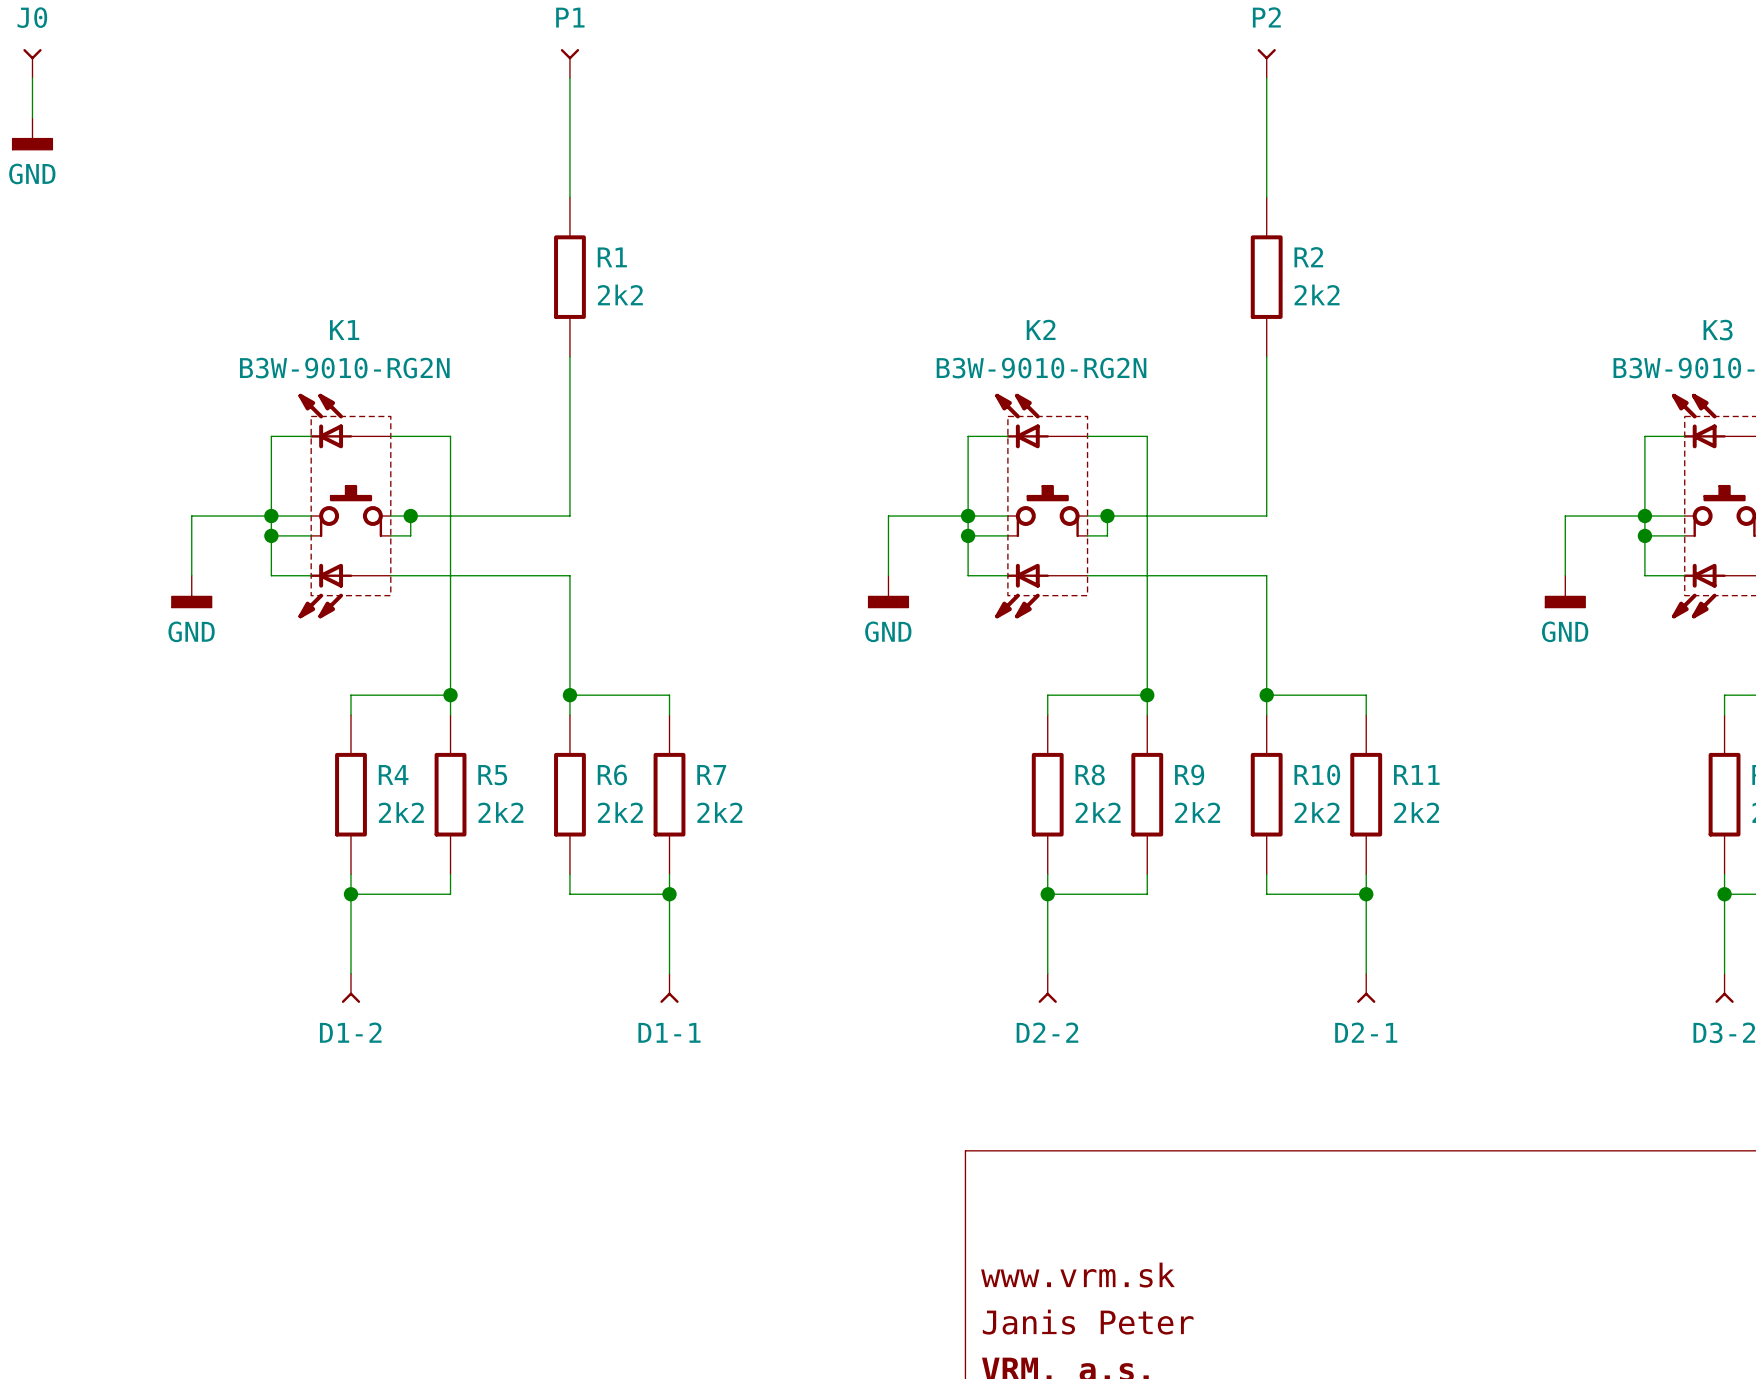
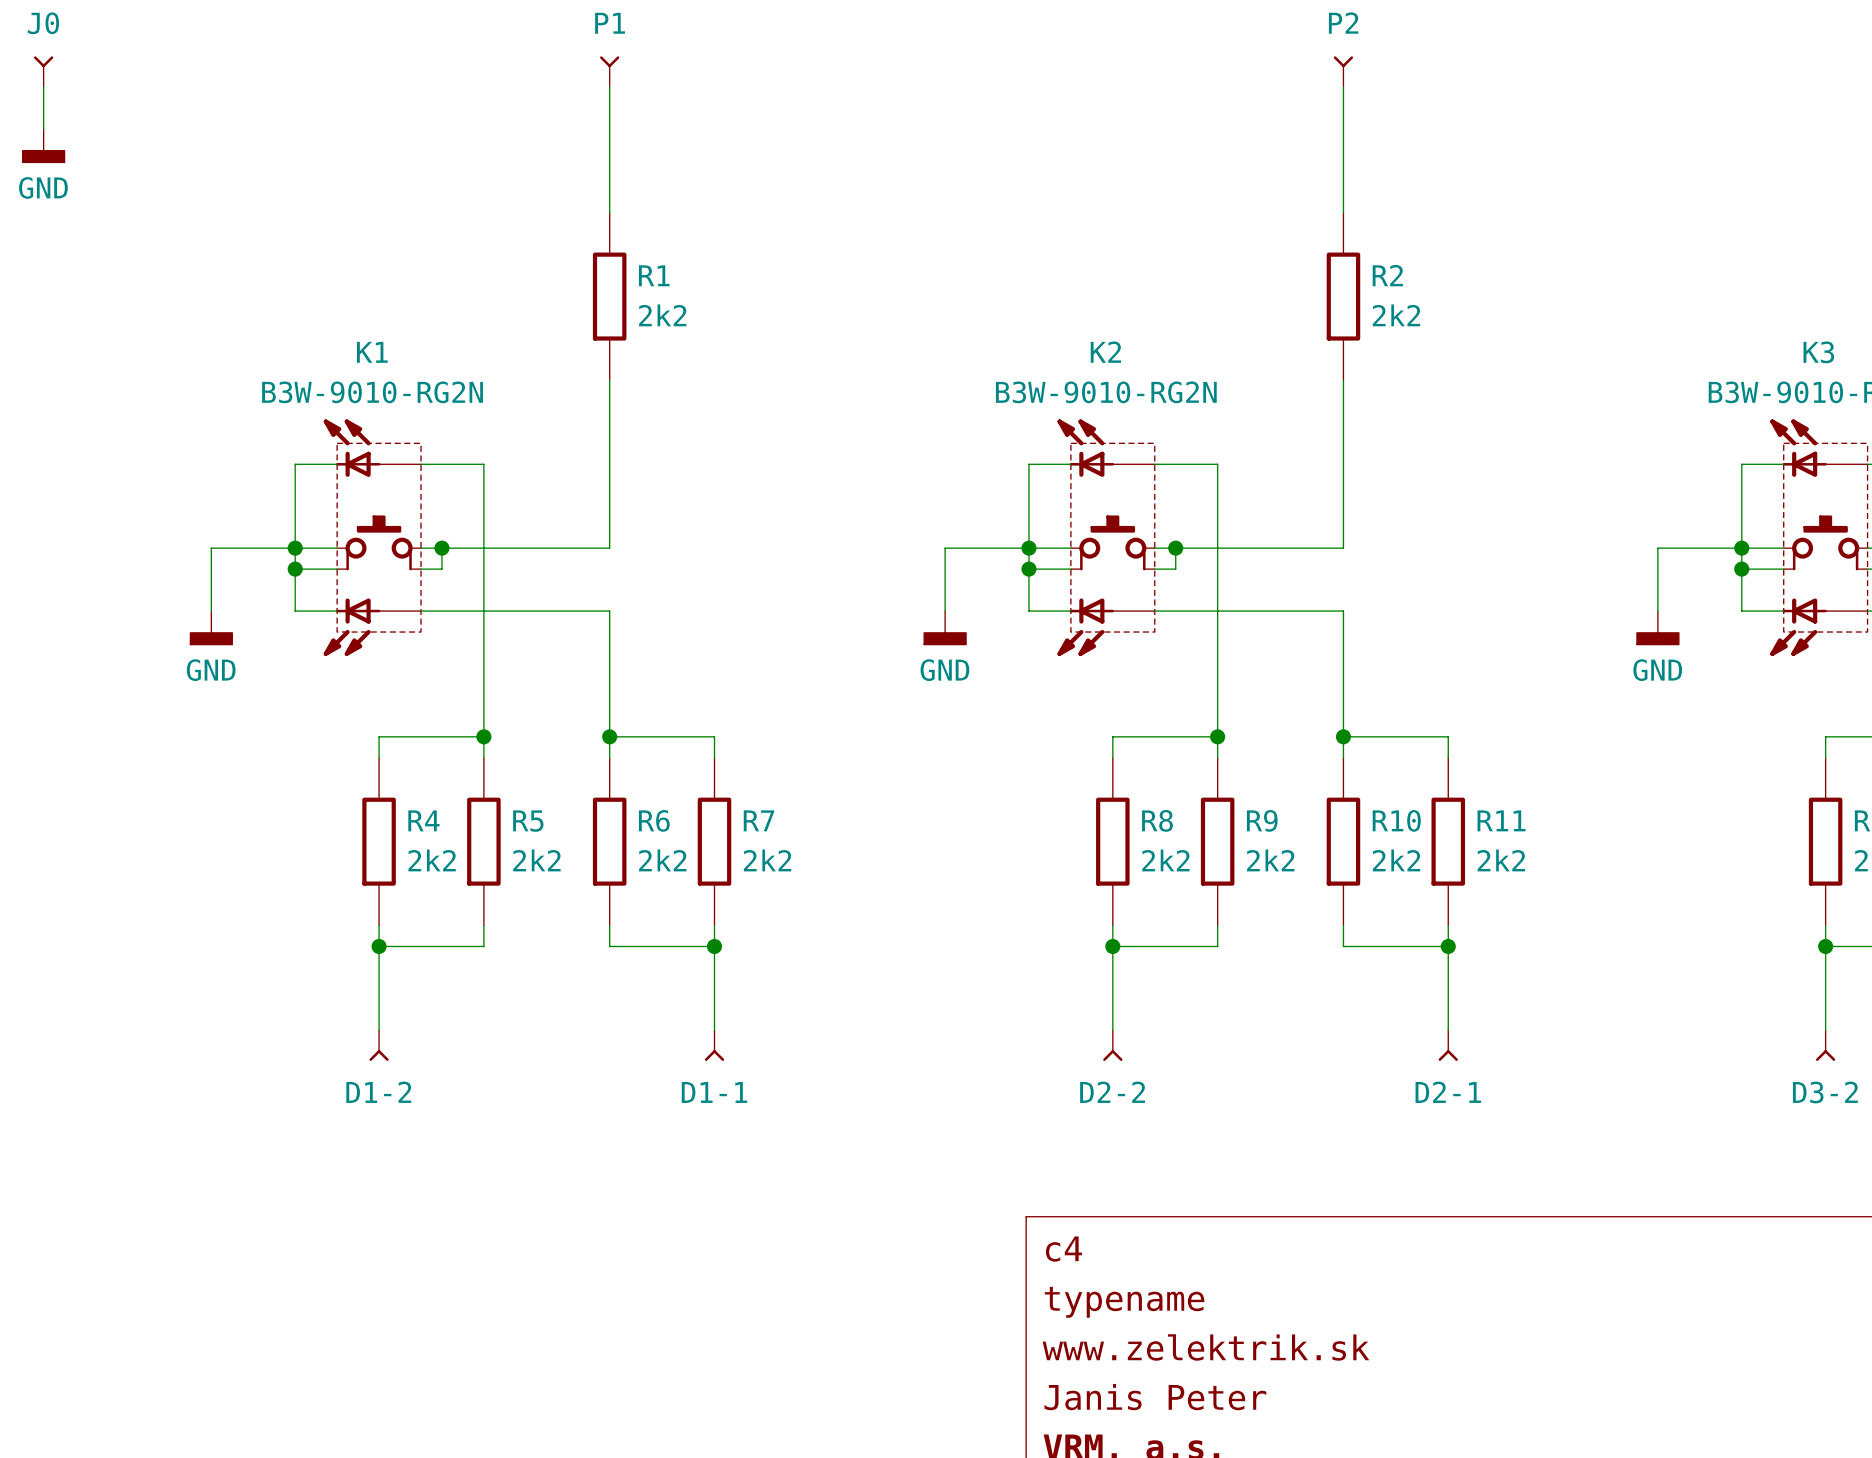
title block: none -> c4 (1063, 1249)
title block: none -> typename (1124, 1302)
title block: www.vrm.sk (1077, 1275) -> www.zelektrik.sk (1206, 1347)

